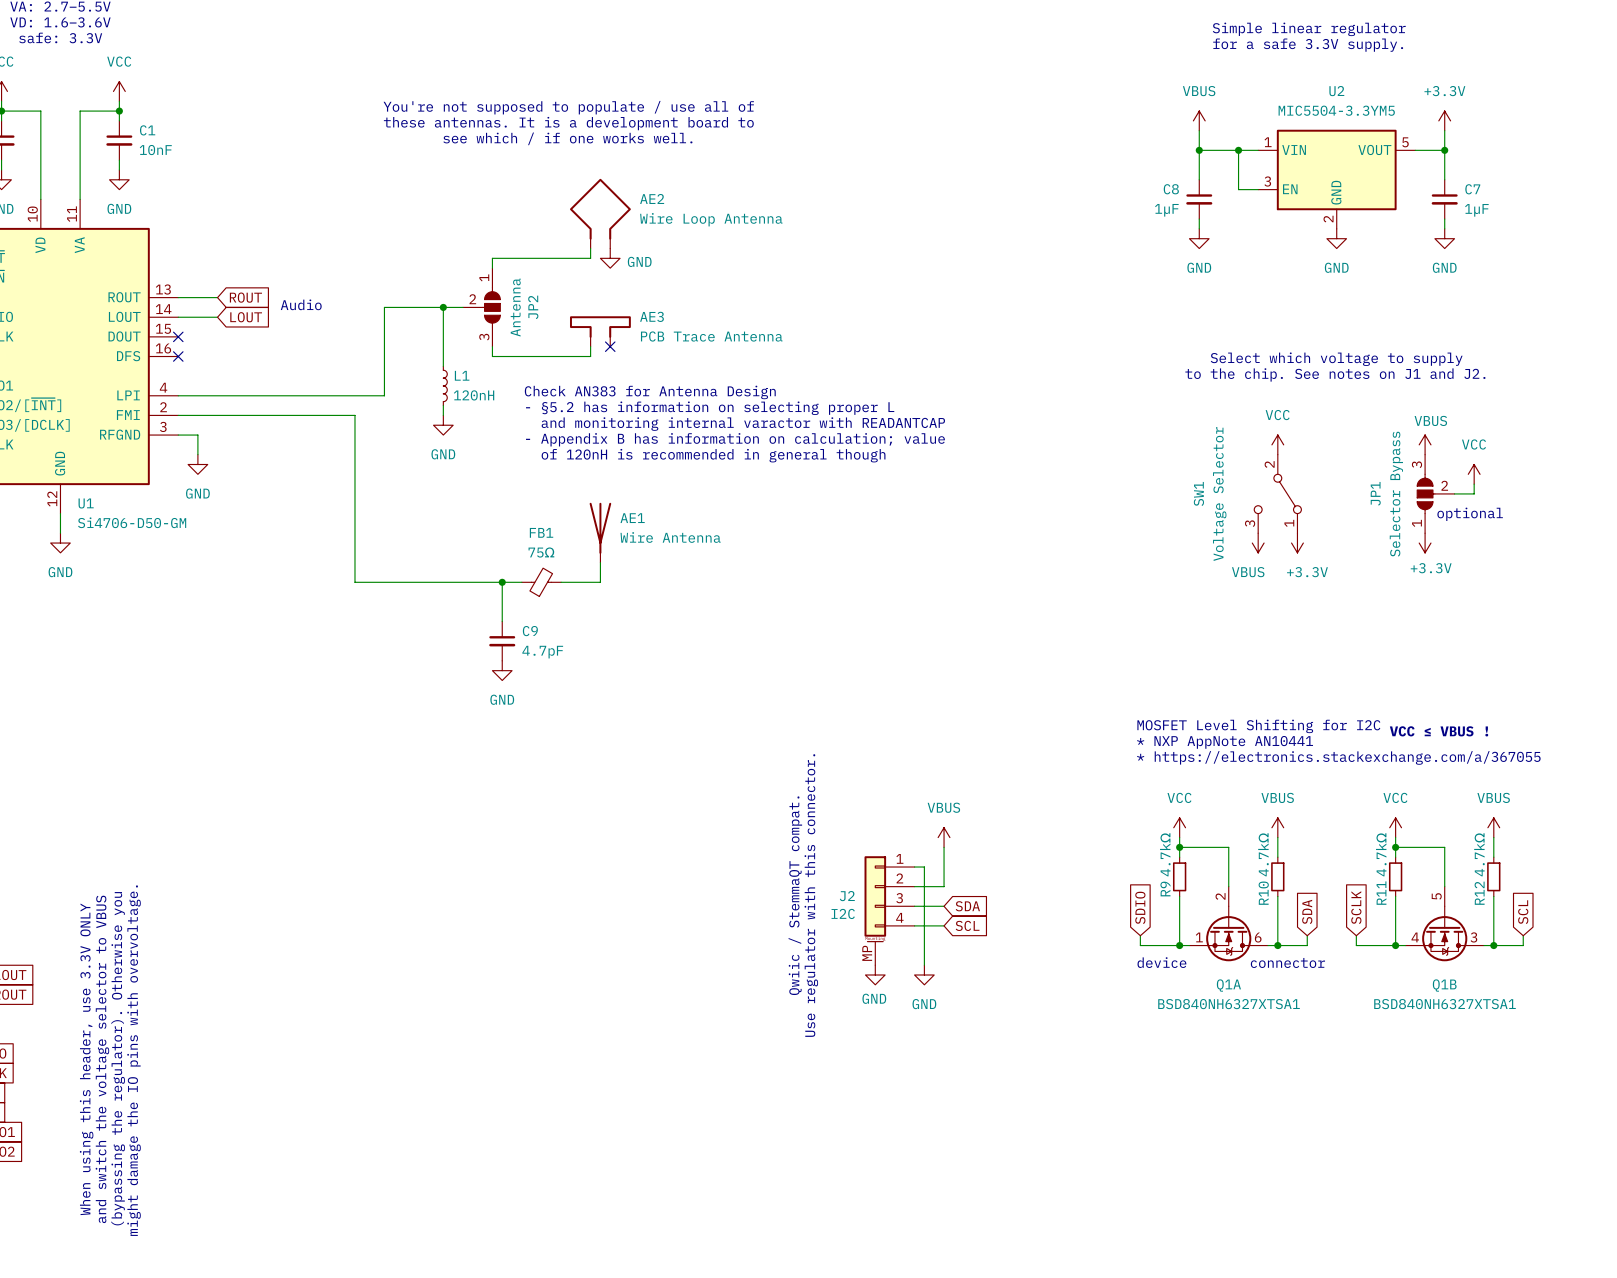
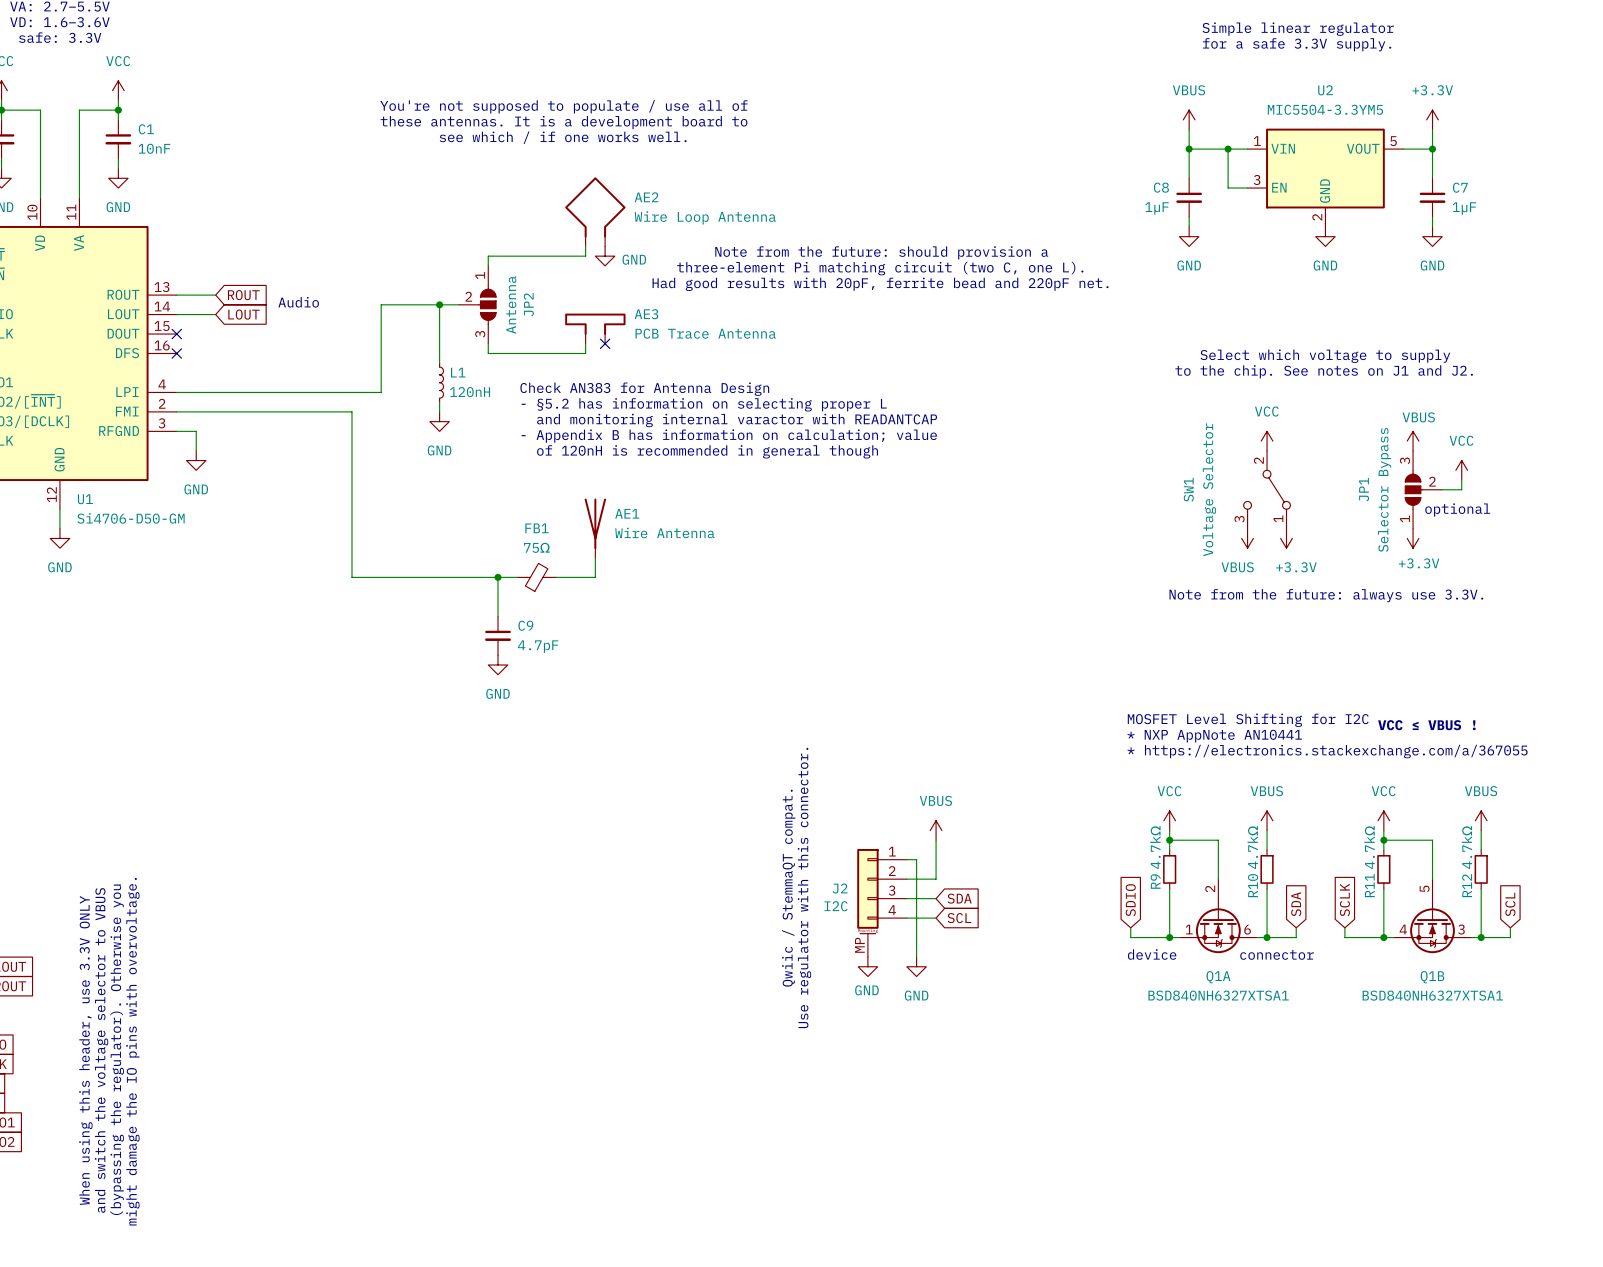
text: none -> Note from the future: should provision a (881, 252)
text: none -> three-element Pi matching circuit (two C, one L). (880, 268)
text: none -> Had good results with 20pF, ferrite bead and 220pF net. (880, 284)
text: none -> Note from the future: always use 3.3V. (1326, 595)

